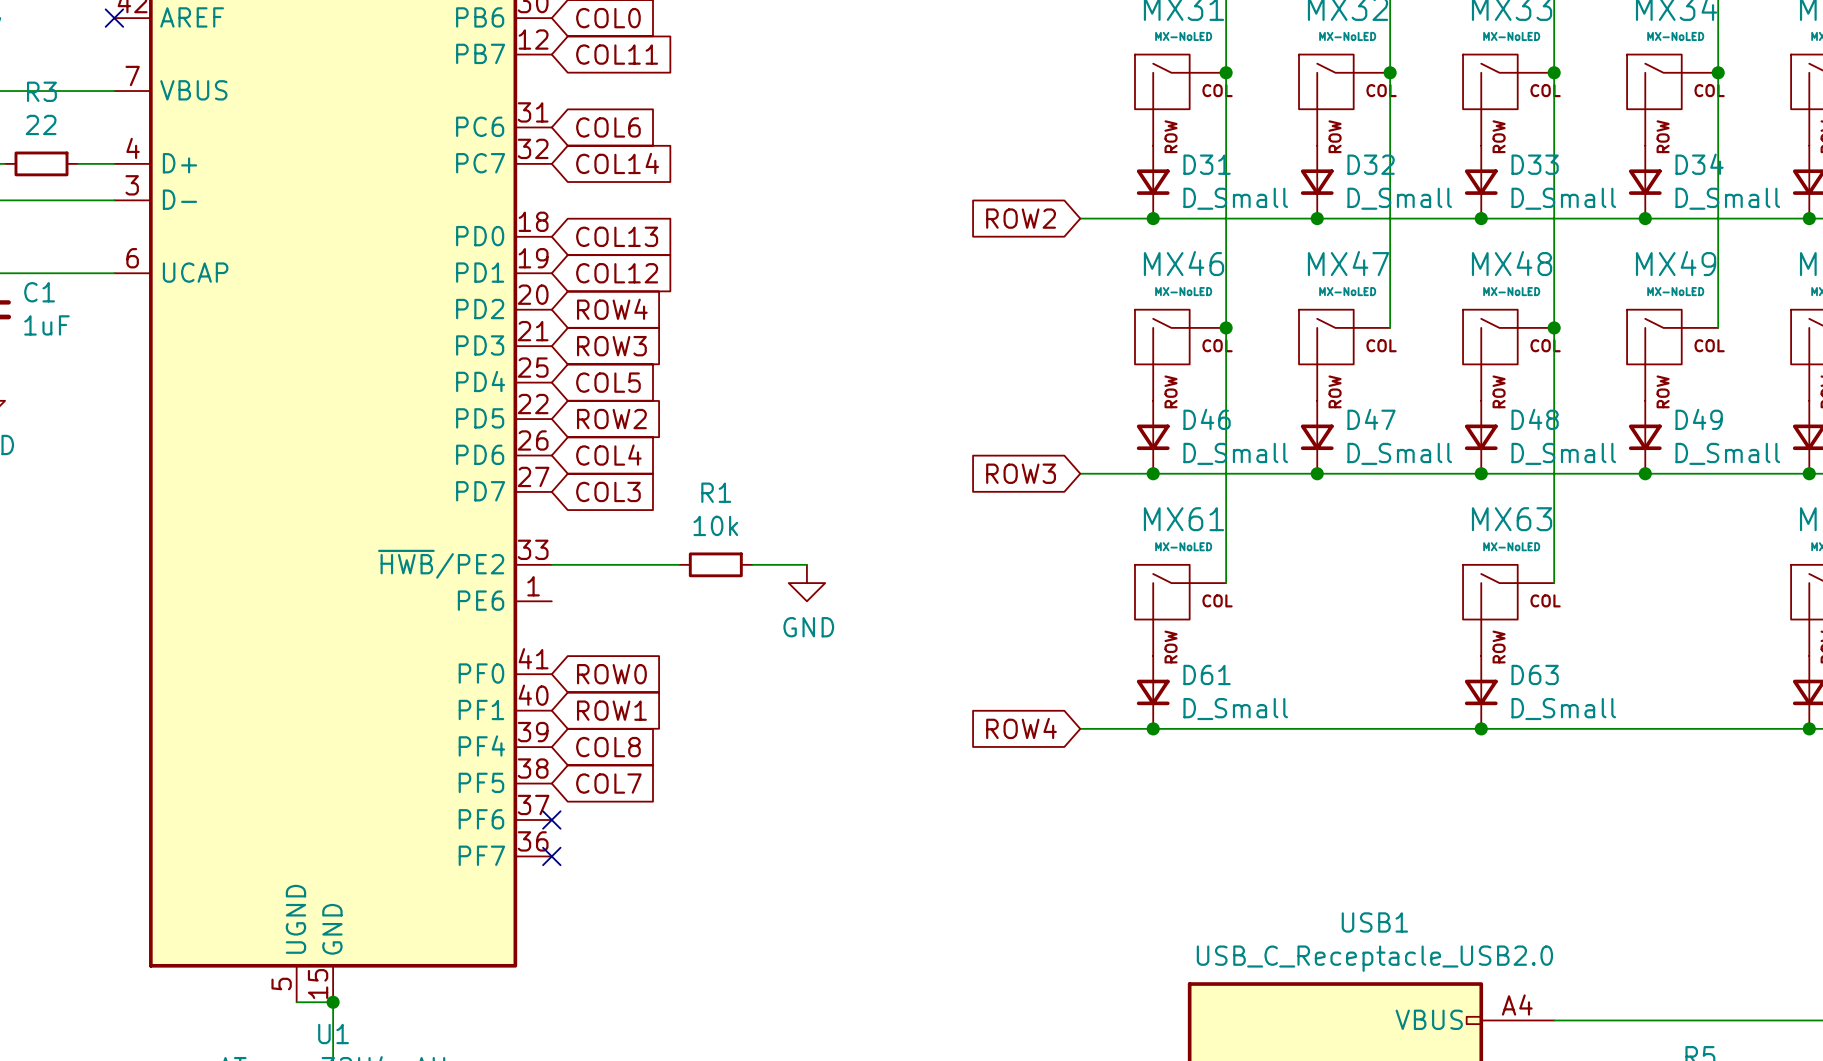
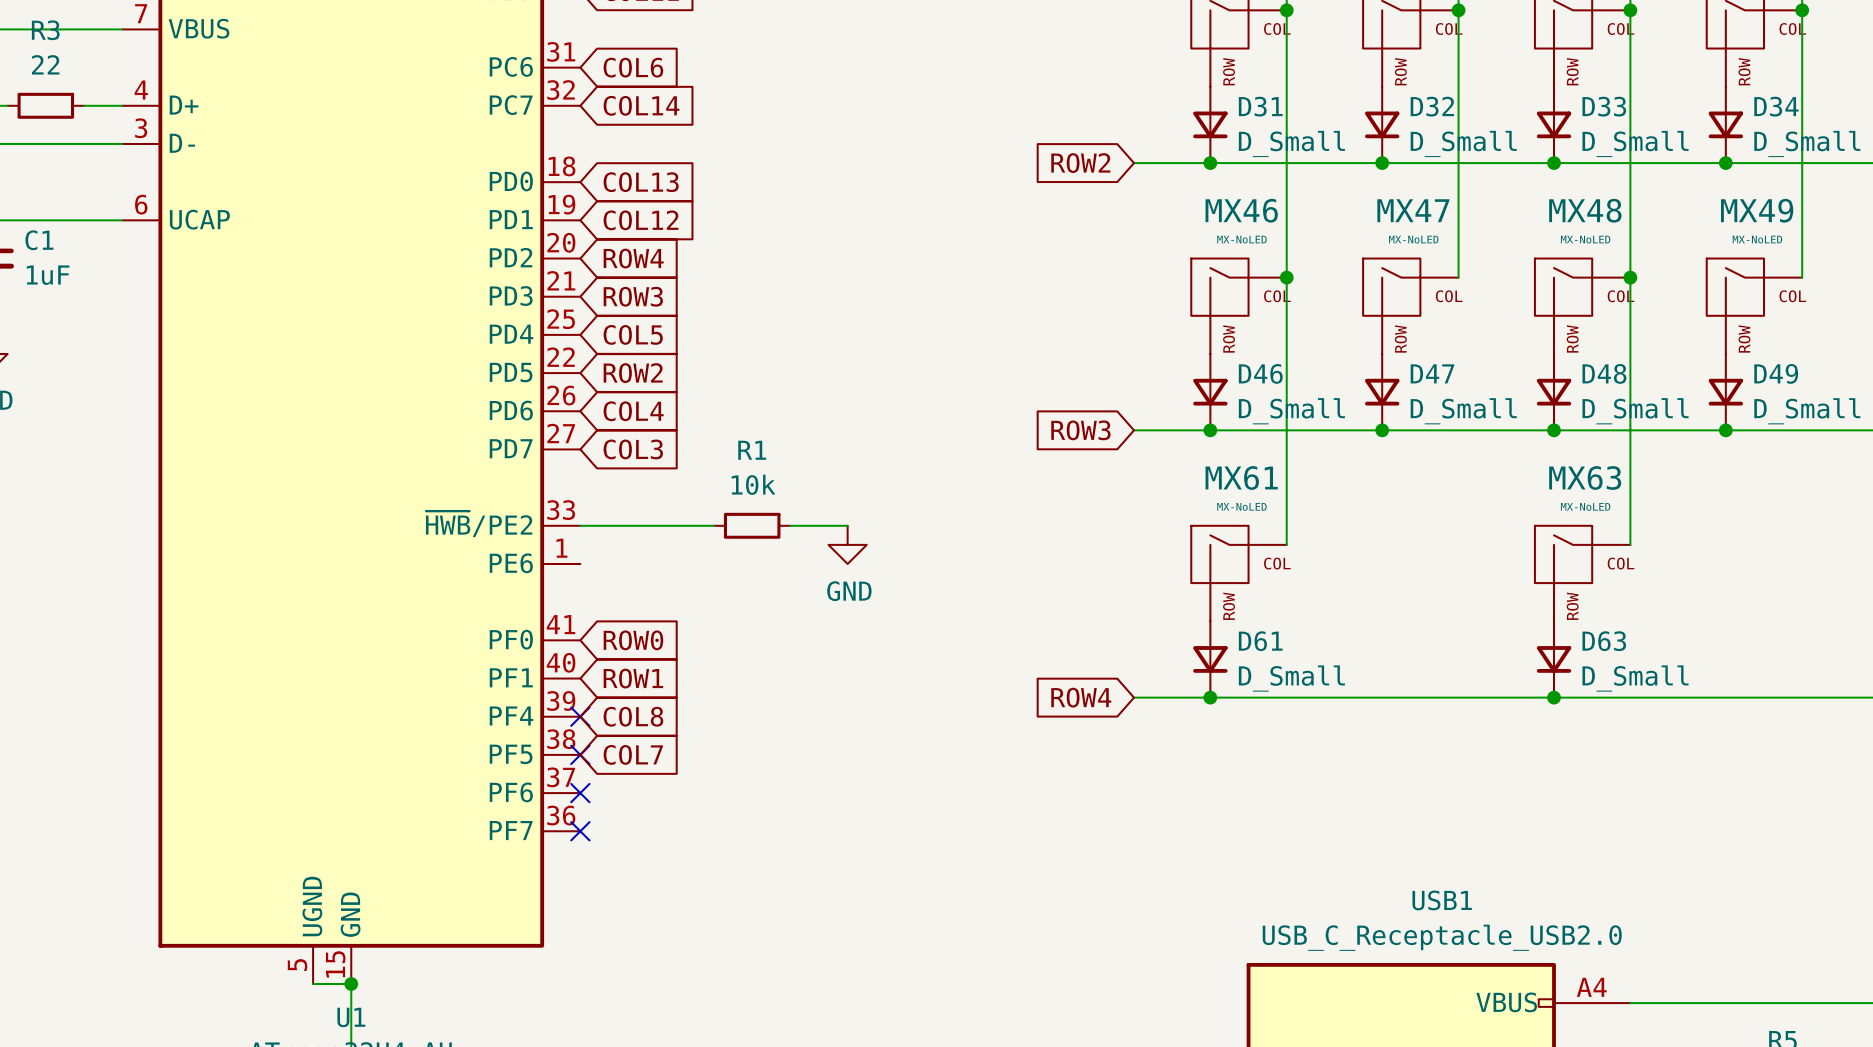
no-connect mark: none -> (580, 716)
no-connect mark: none -> (580, 754)

